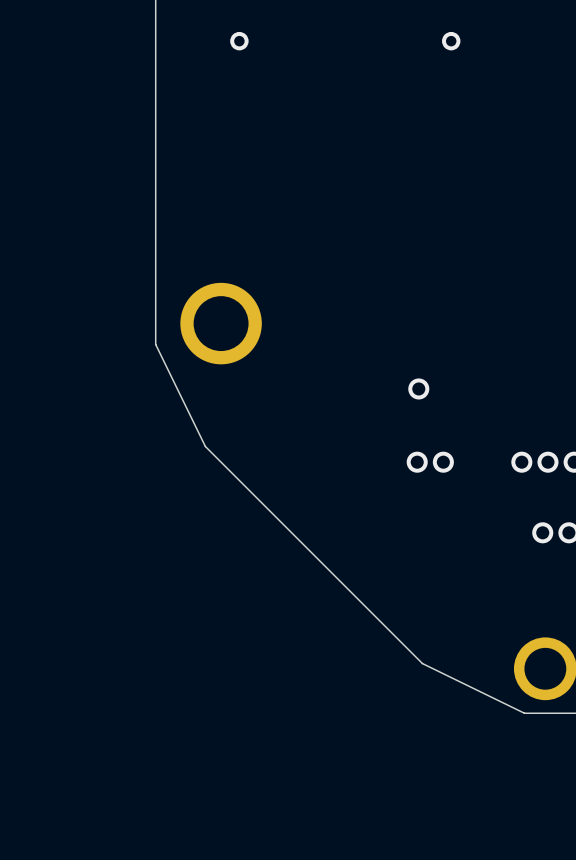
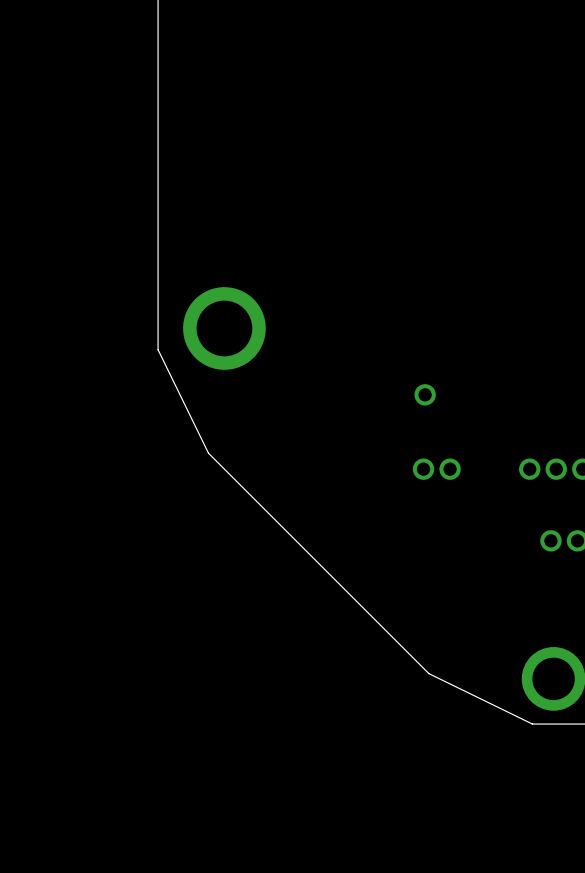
via: (239, 41) -> none
via: (451, 41) -> none

